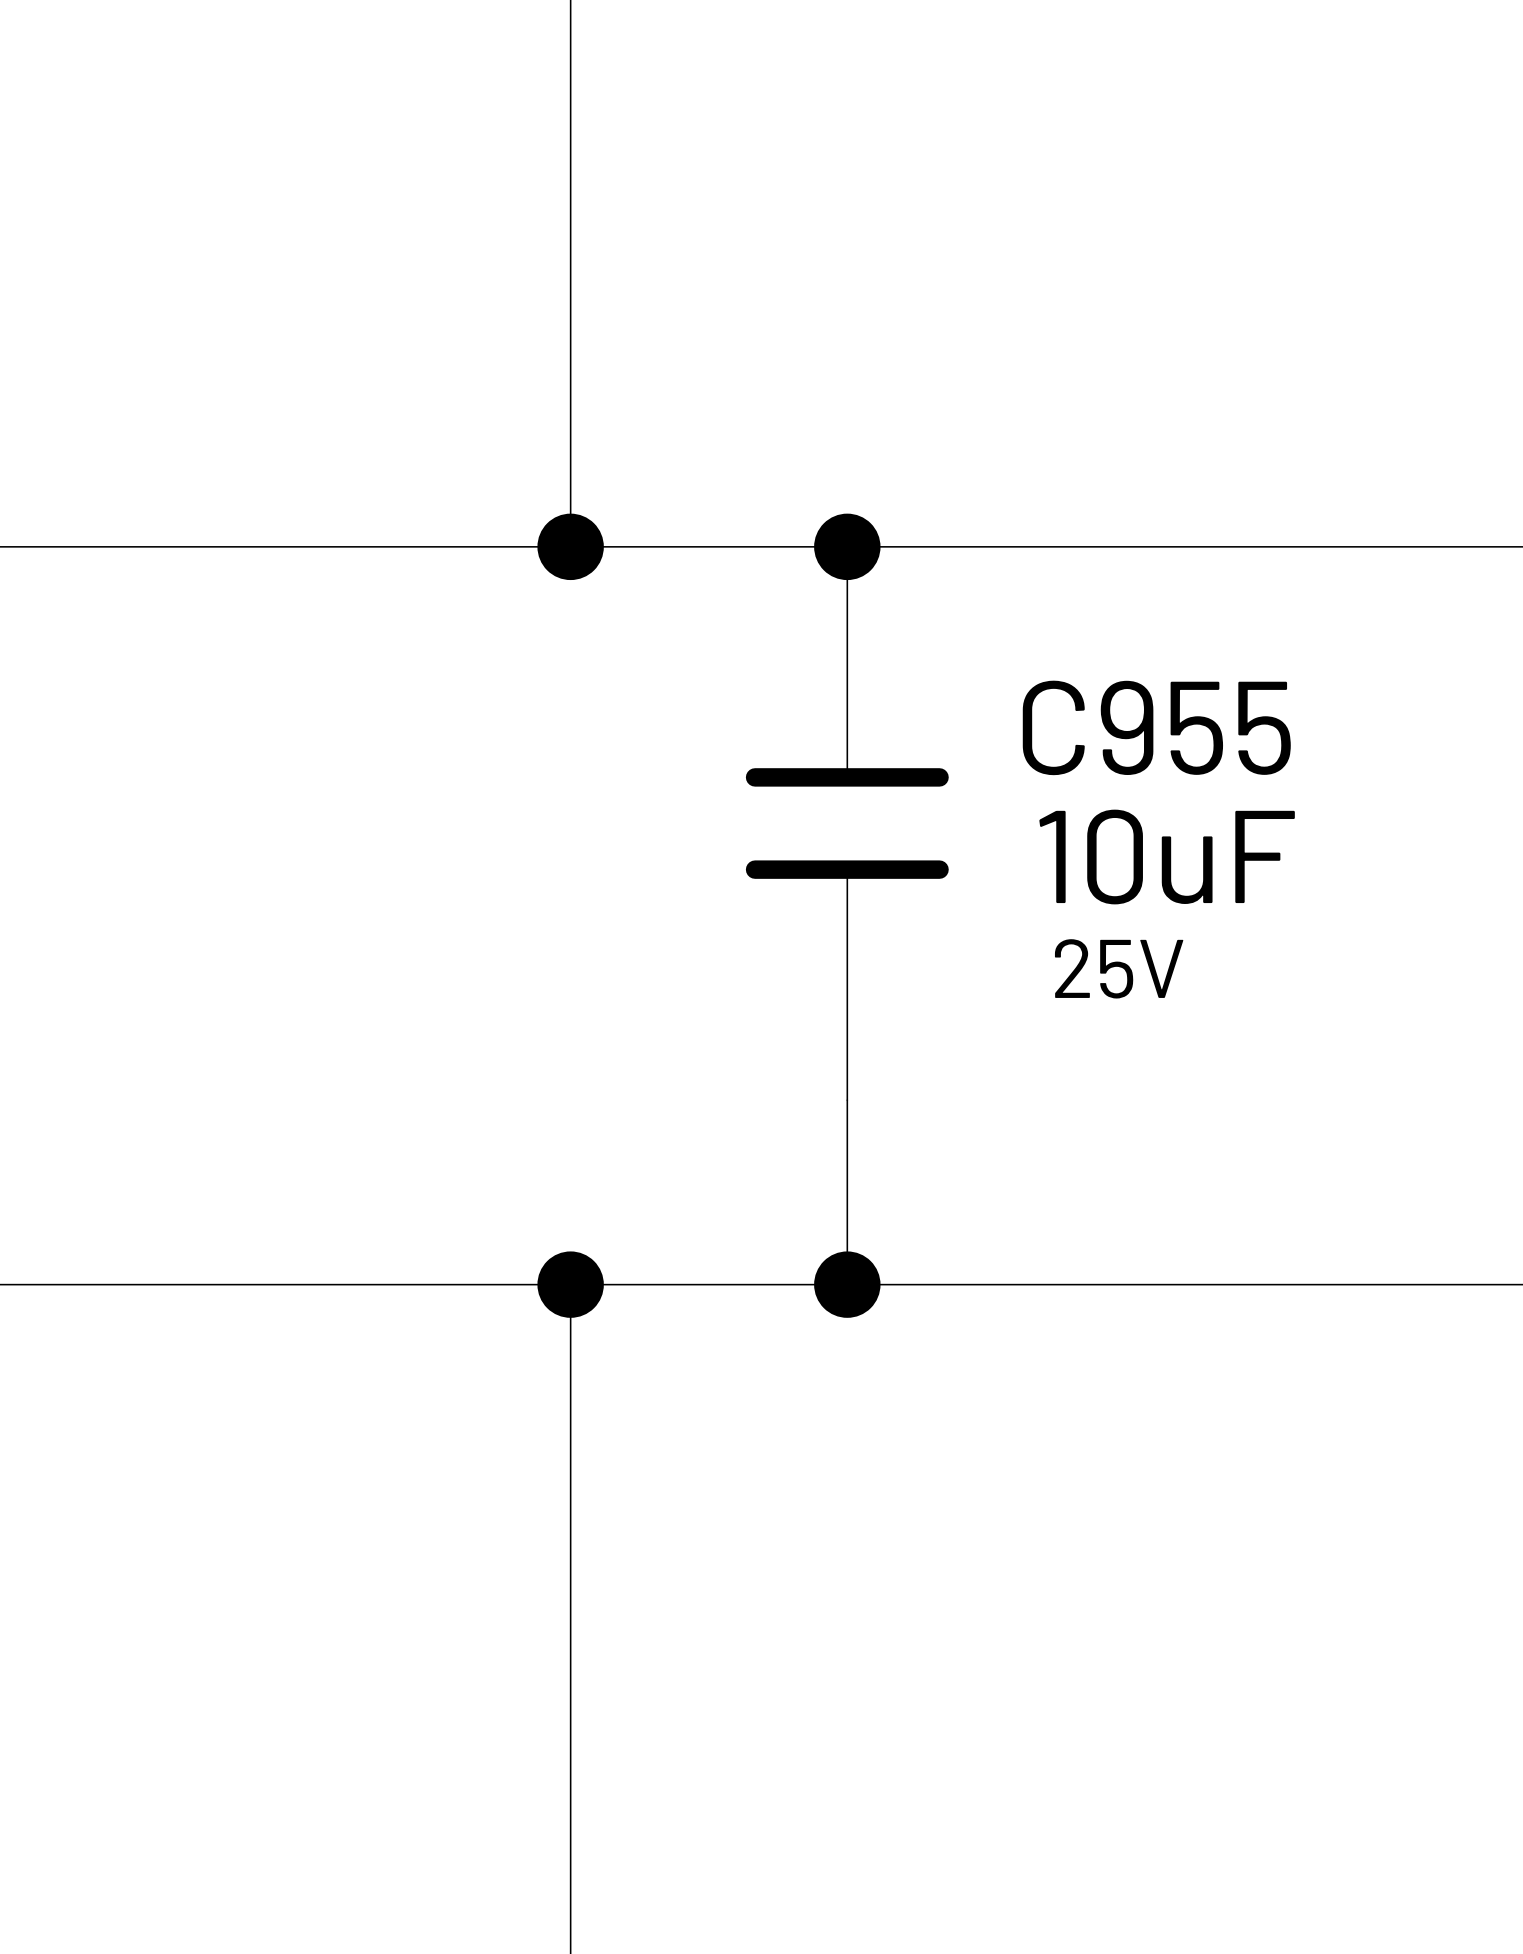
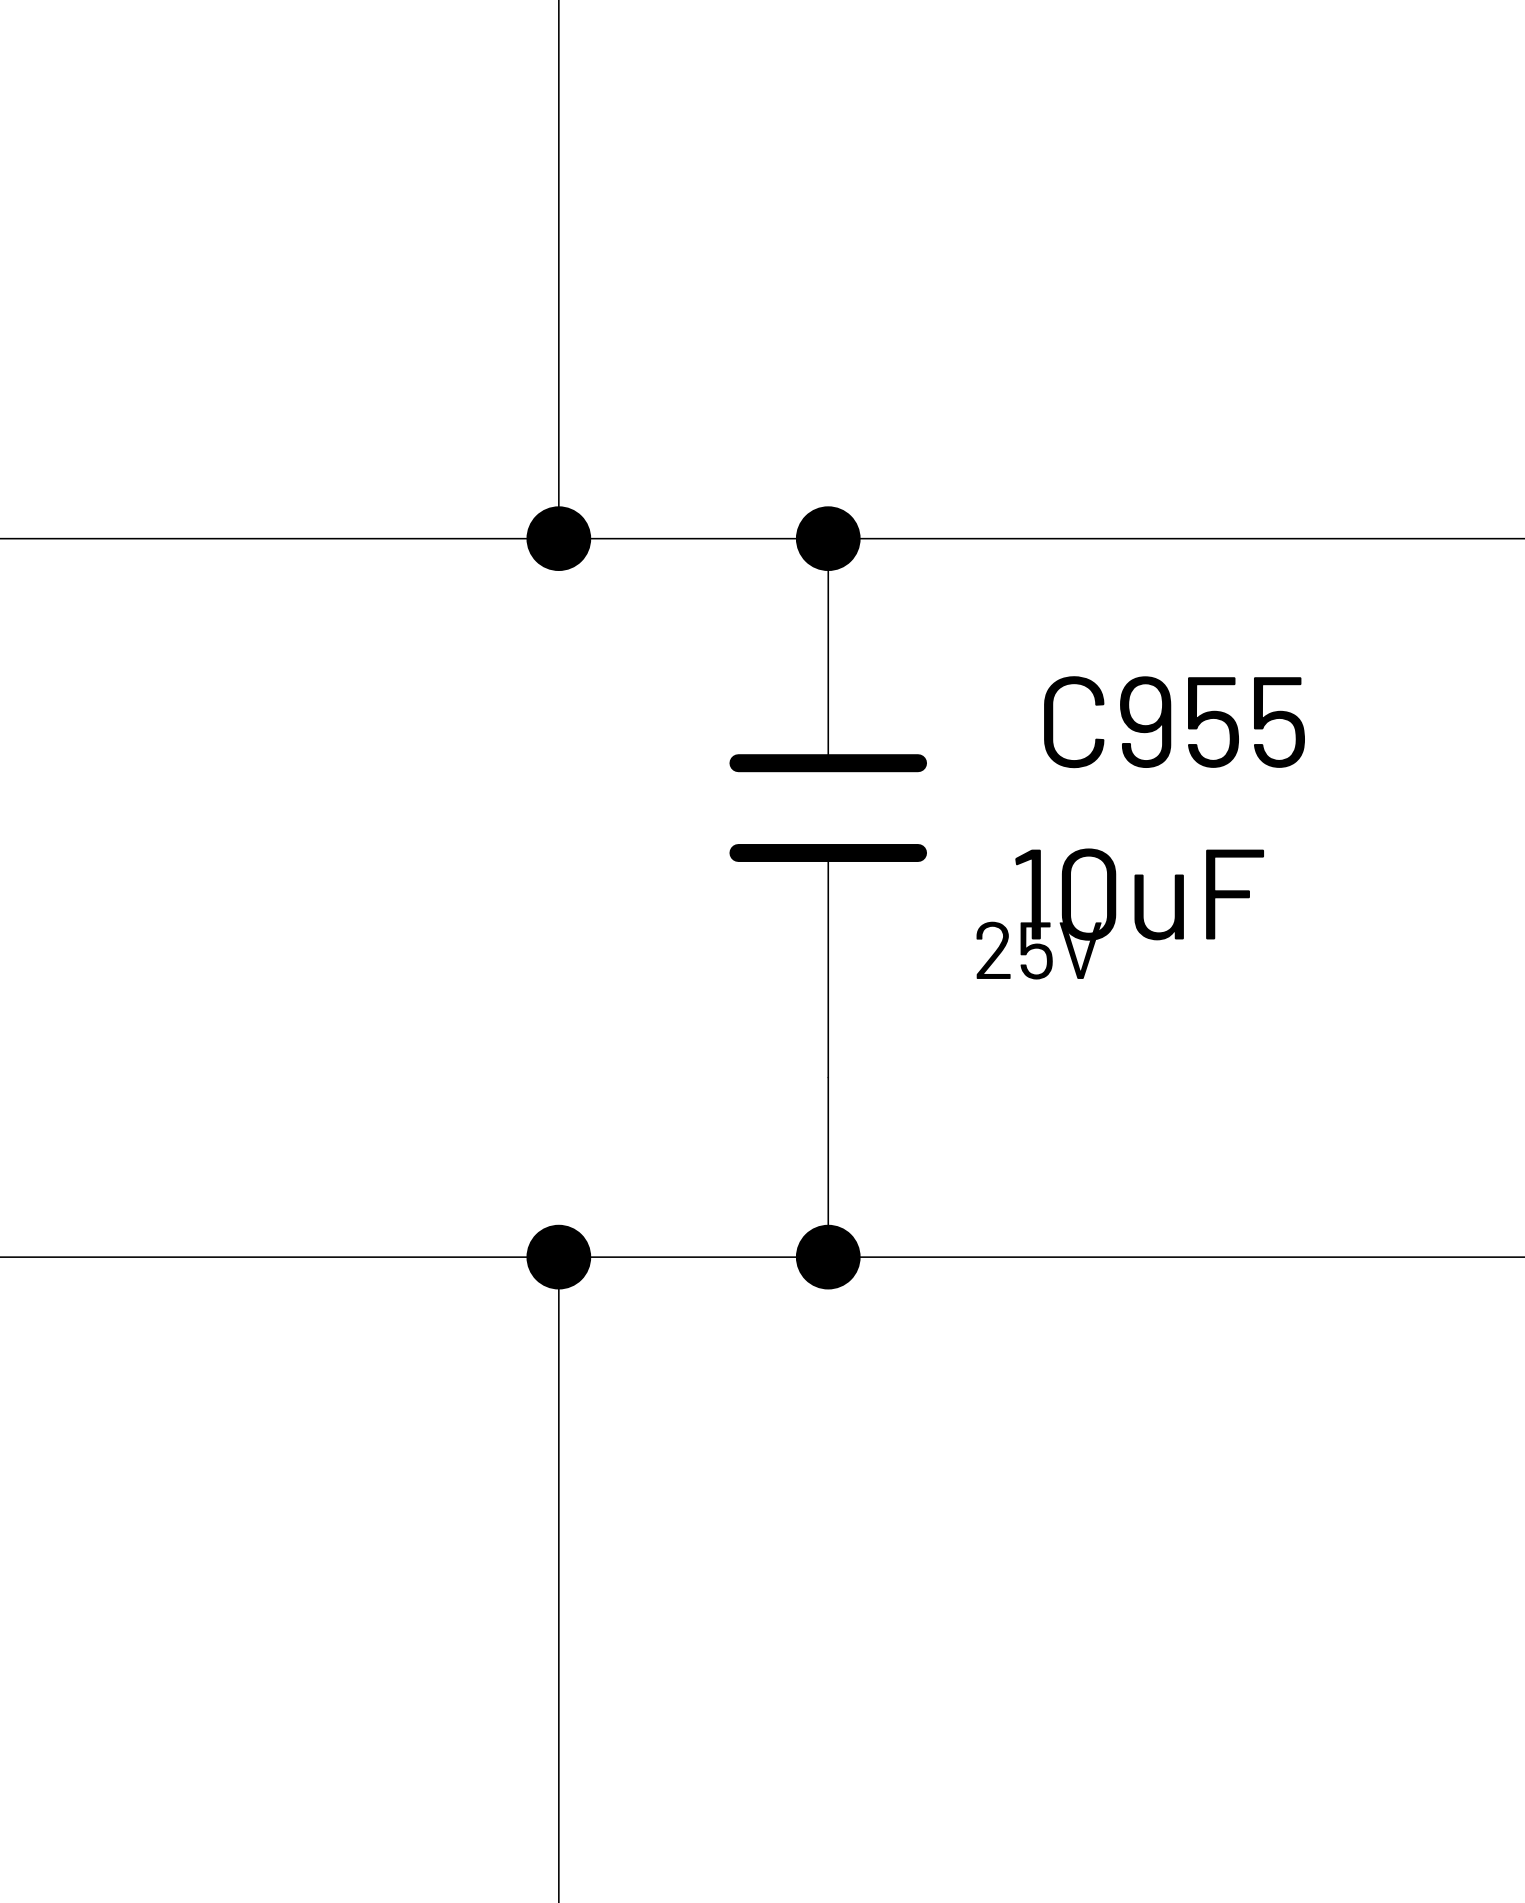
C955 name position: C955 (1156, 727) -> C955 (1174, 722)
C955 value position: 10uF (1167, 857) -> 10uF (1139, 894)
C955 text position: 25V (1119, 968) -> 25V (1039, 950)

